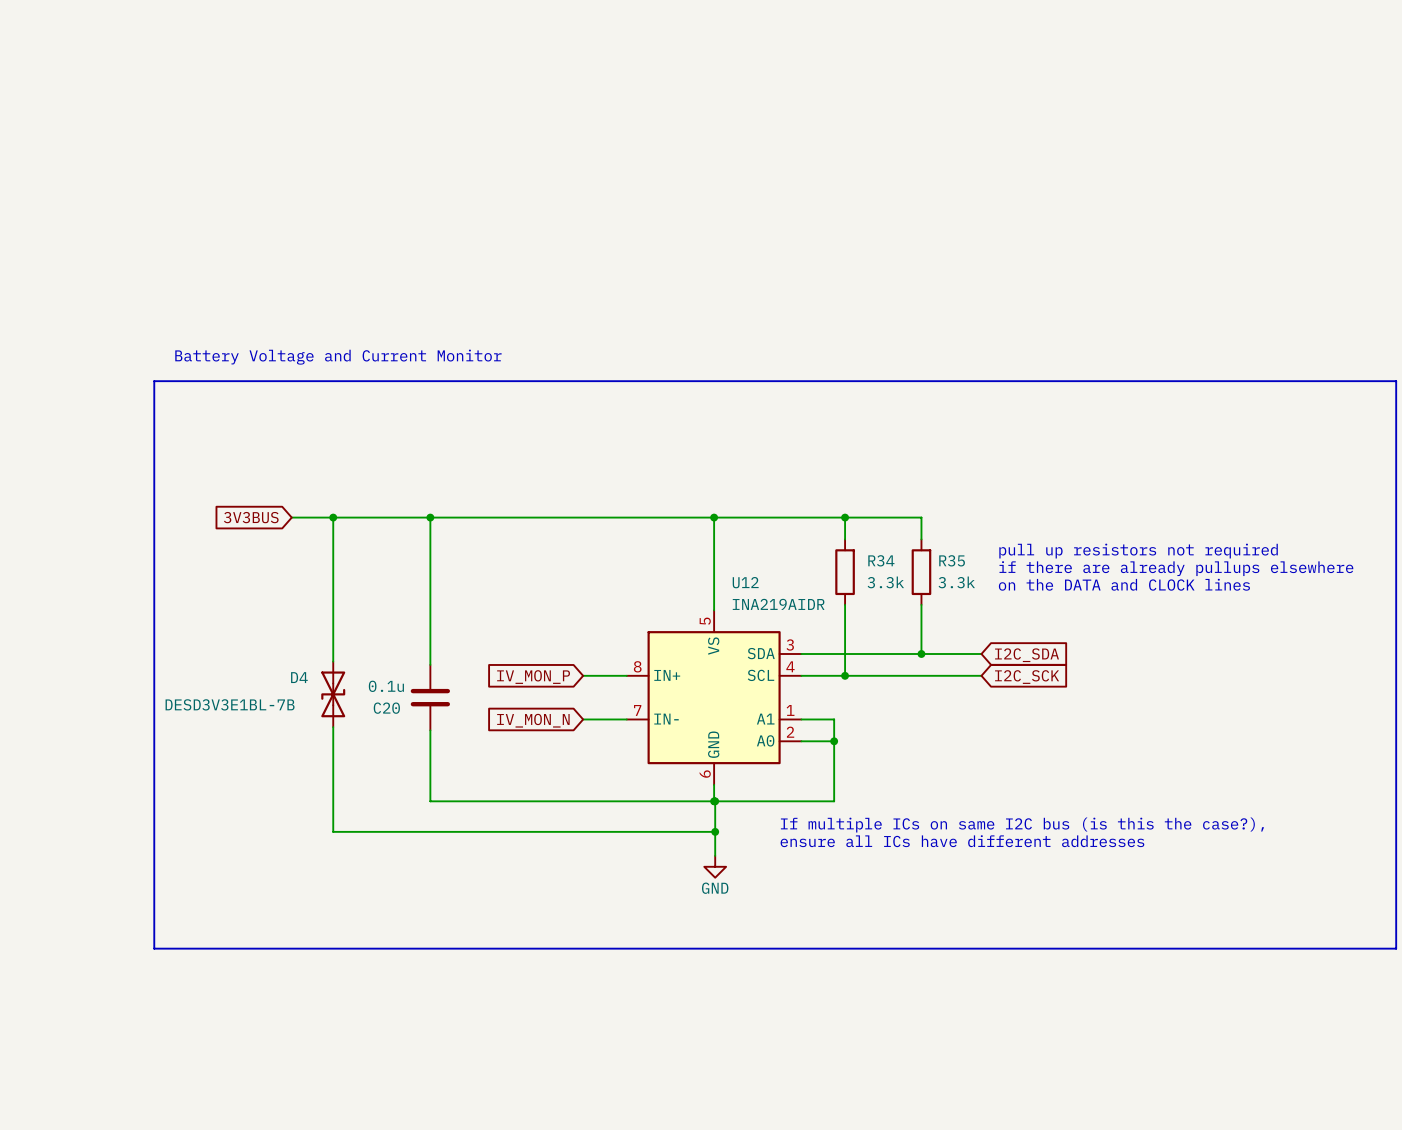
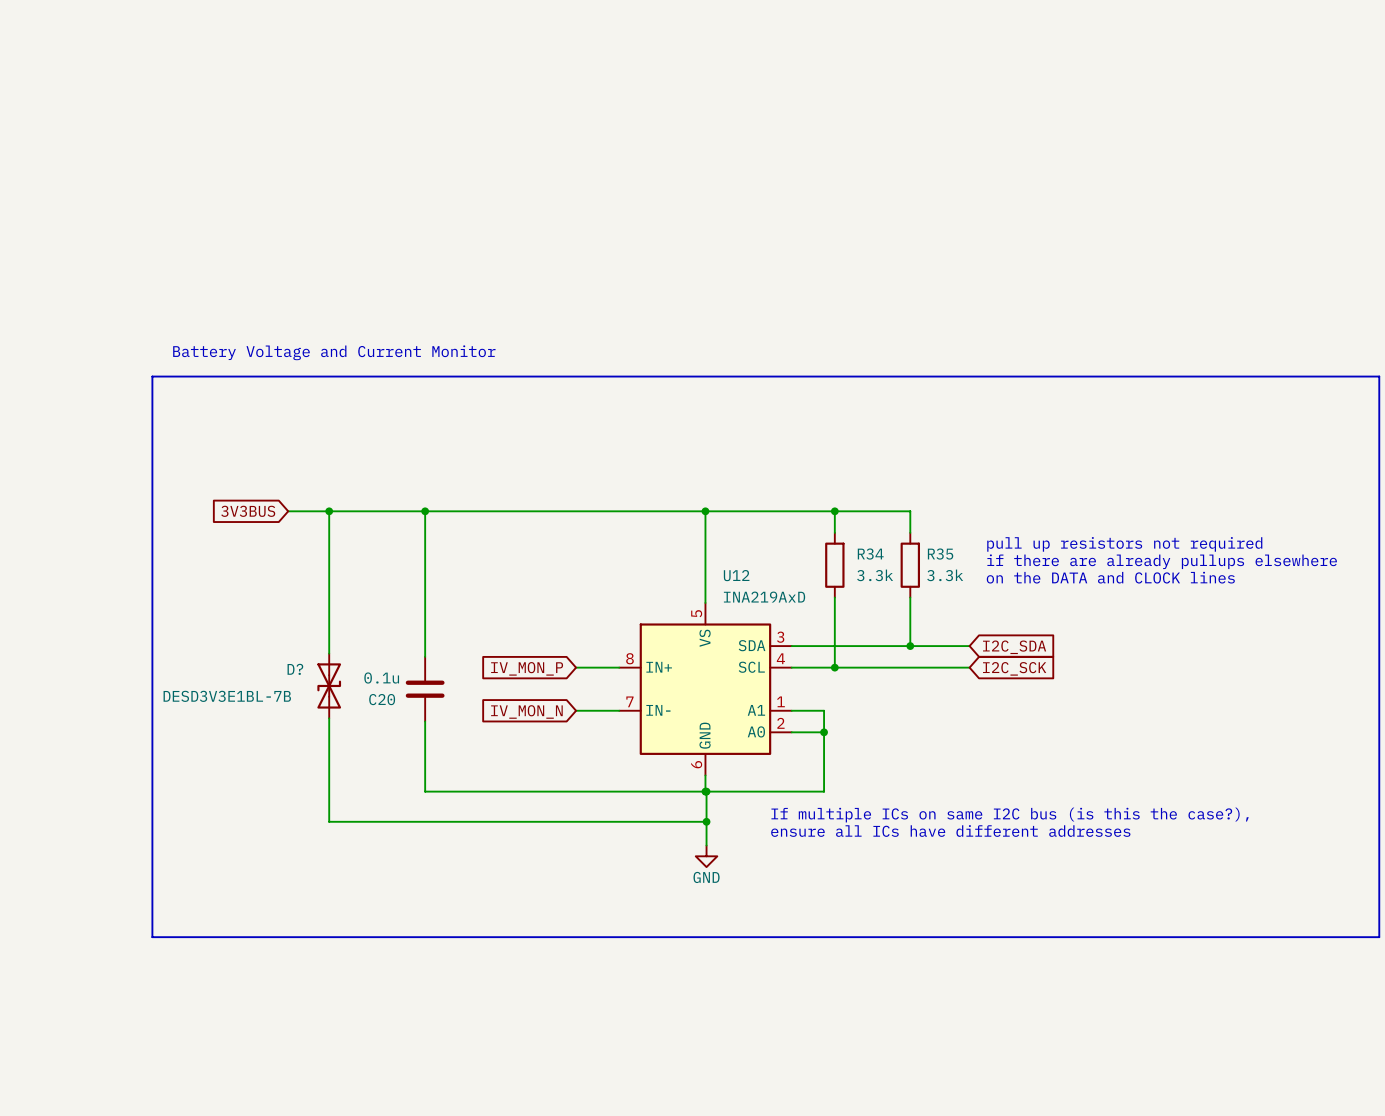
U12 value: INA219AIDR (778, 604) -> INA219AxD (764, 597)
D4 name: D4 (299, 677) -> D? (295, 669)

